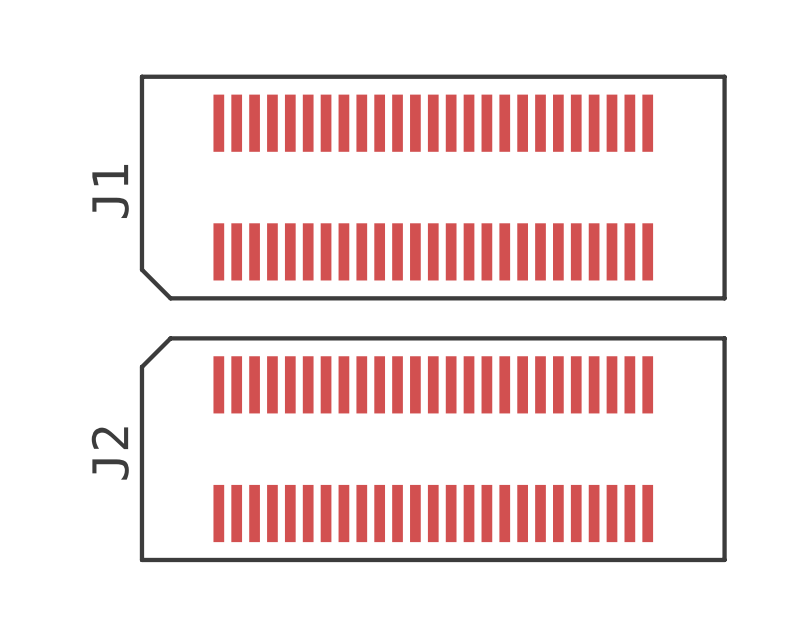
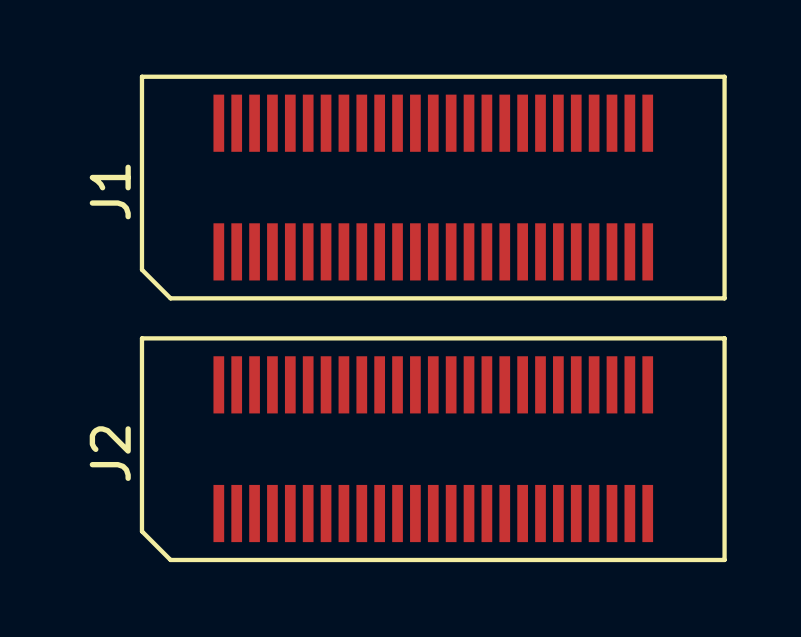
J2 footprint: [139, 336, 727, 563] -> [139, 336, 727, 563]

